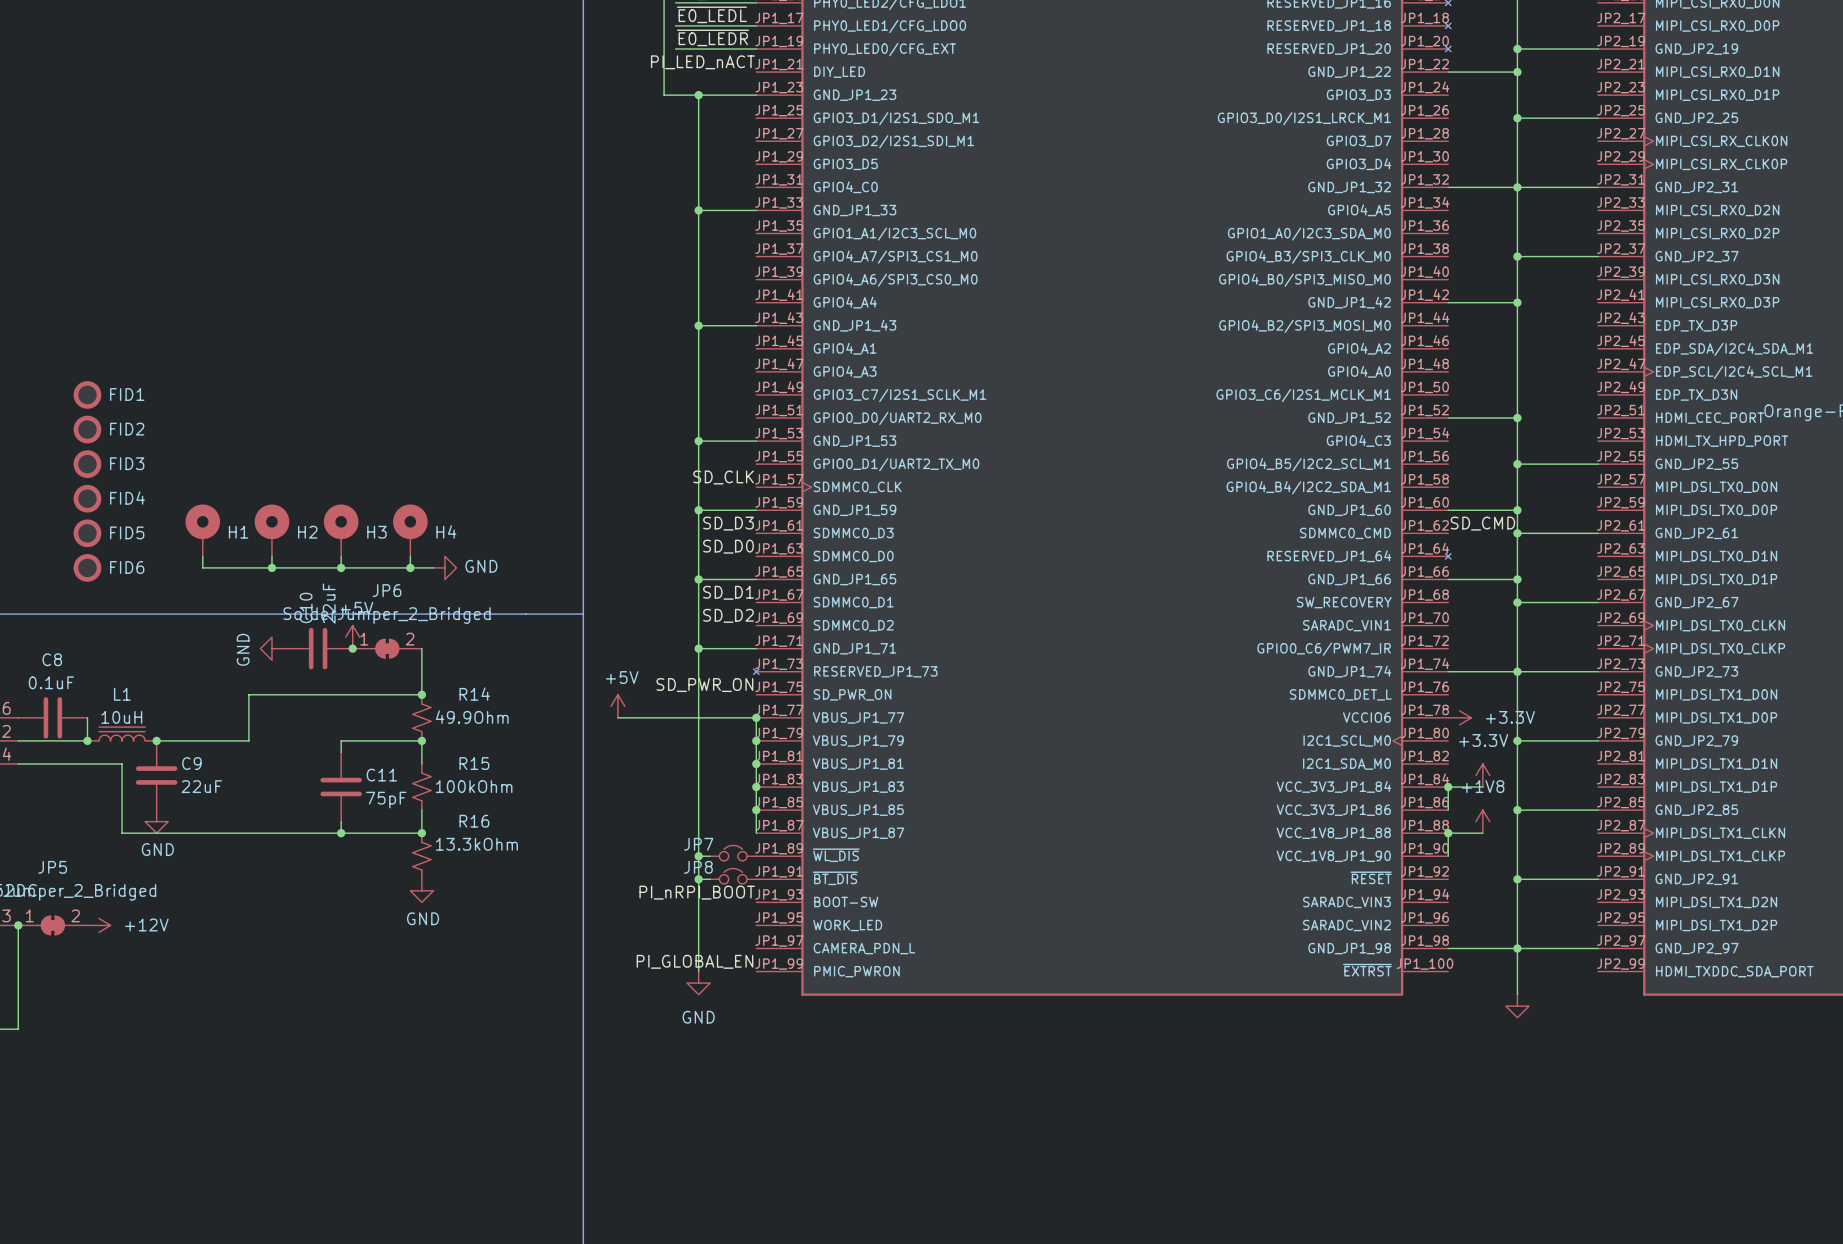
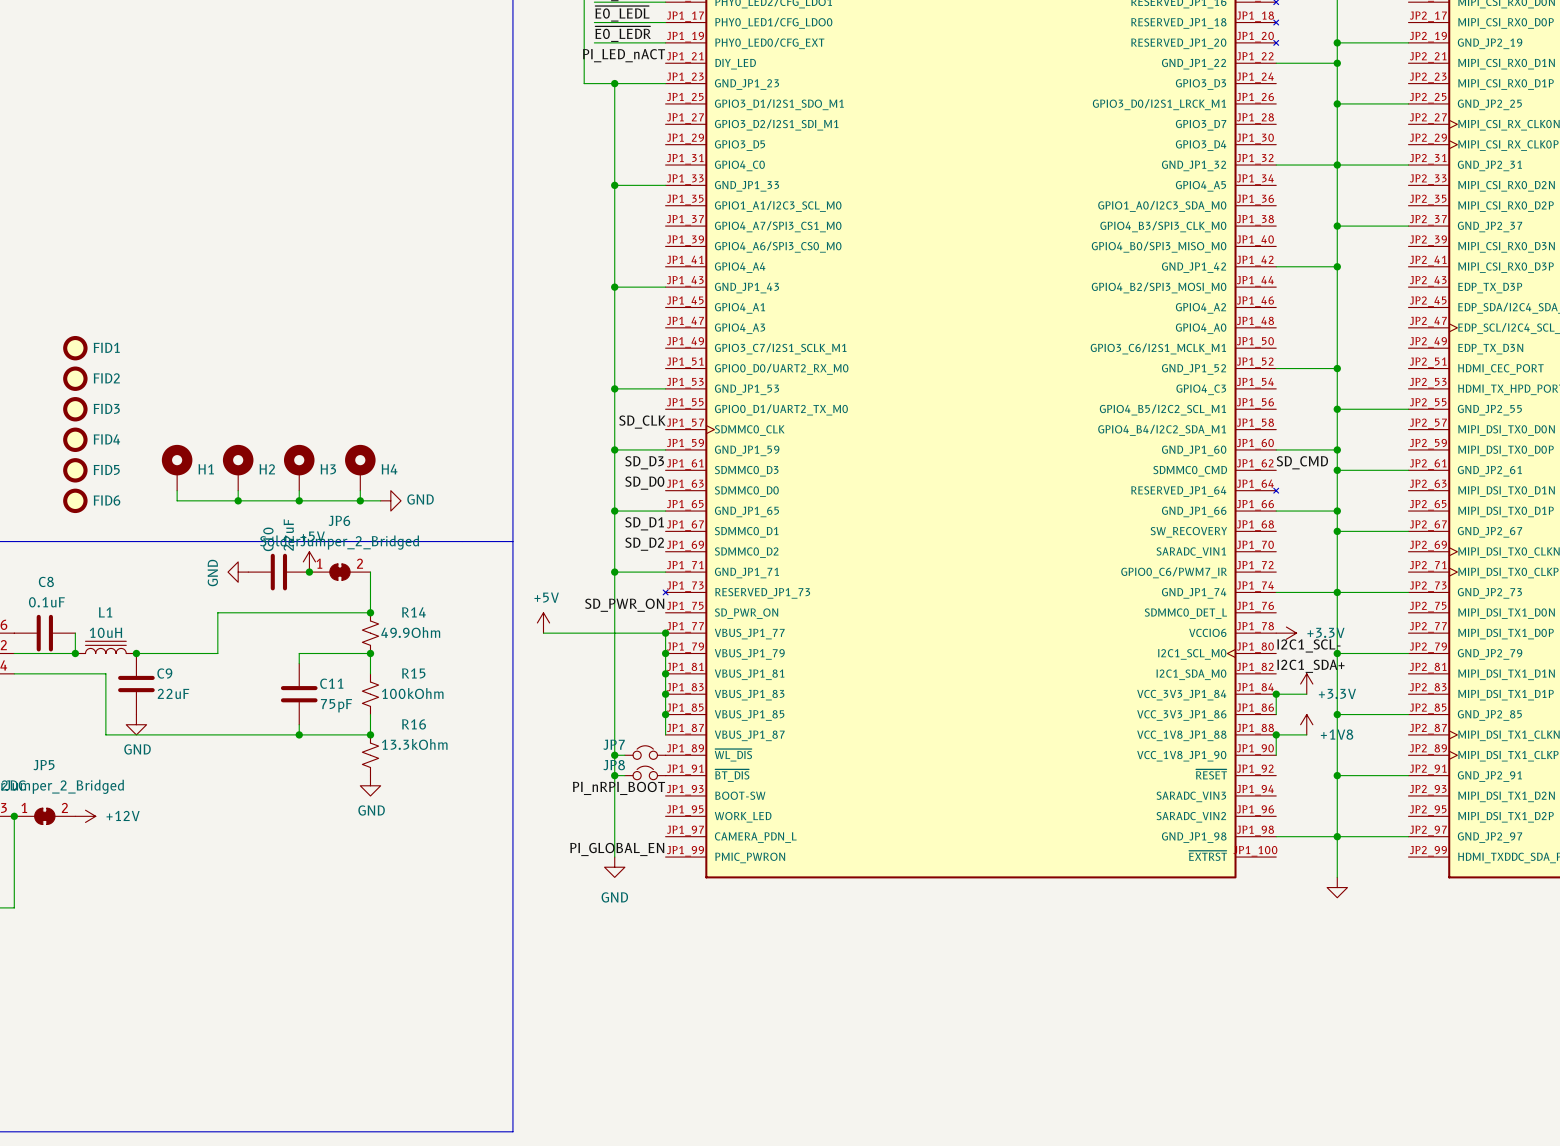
label: none -> I2C1_SCL- (1308, 645)
power symbol text position: +3.3V (1483, 740) -> +3.3V (1337, 693)
label: none -> I2C1_SDA+ (1310, 666)
power symbol text position: +1V8 (1483, 786) -> +1V8 (1337, 734)

